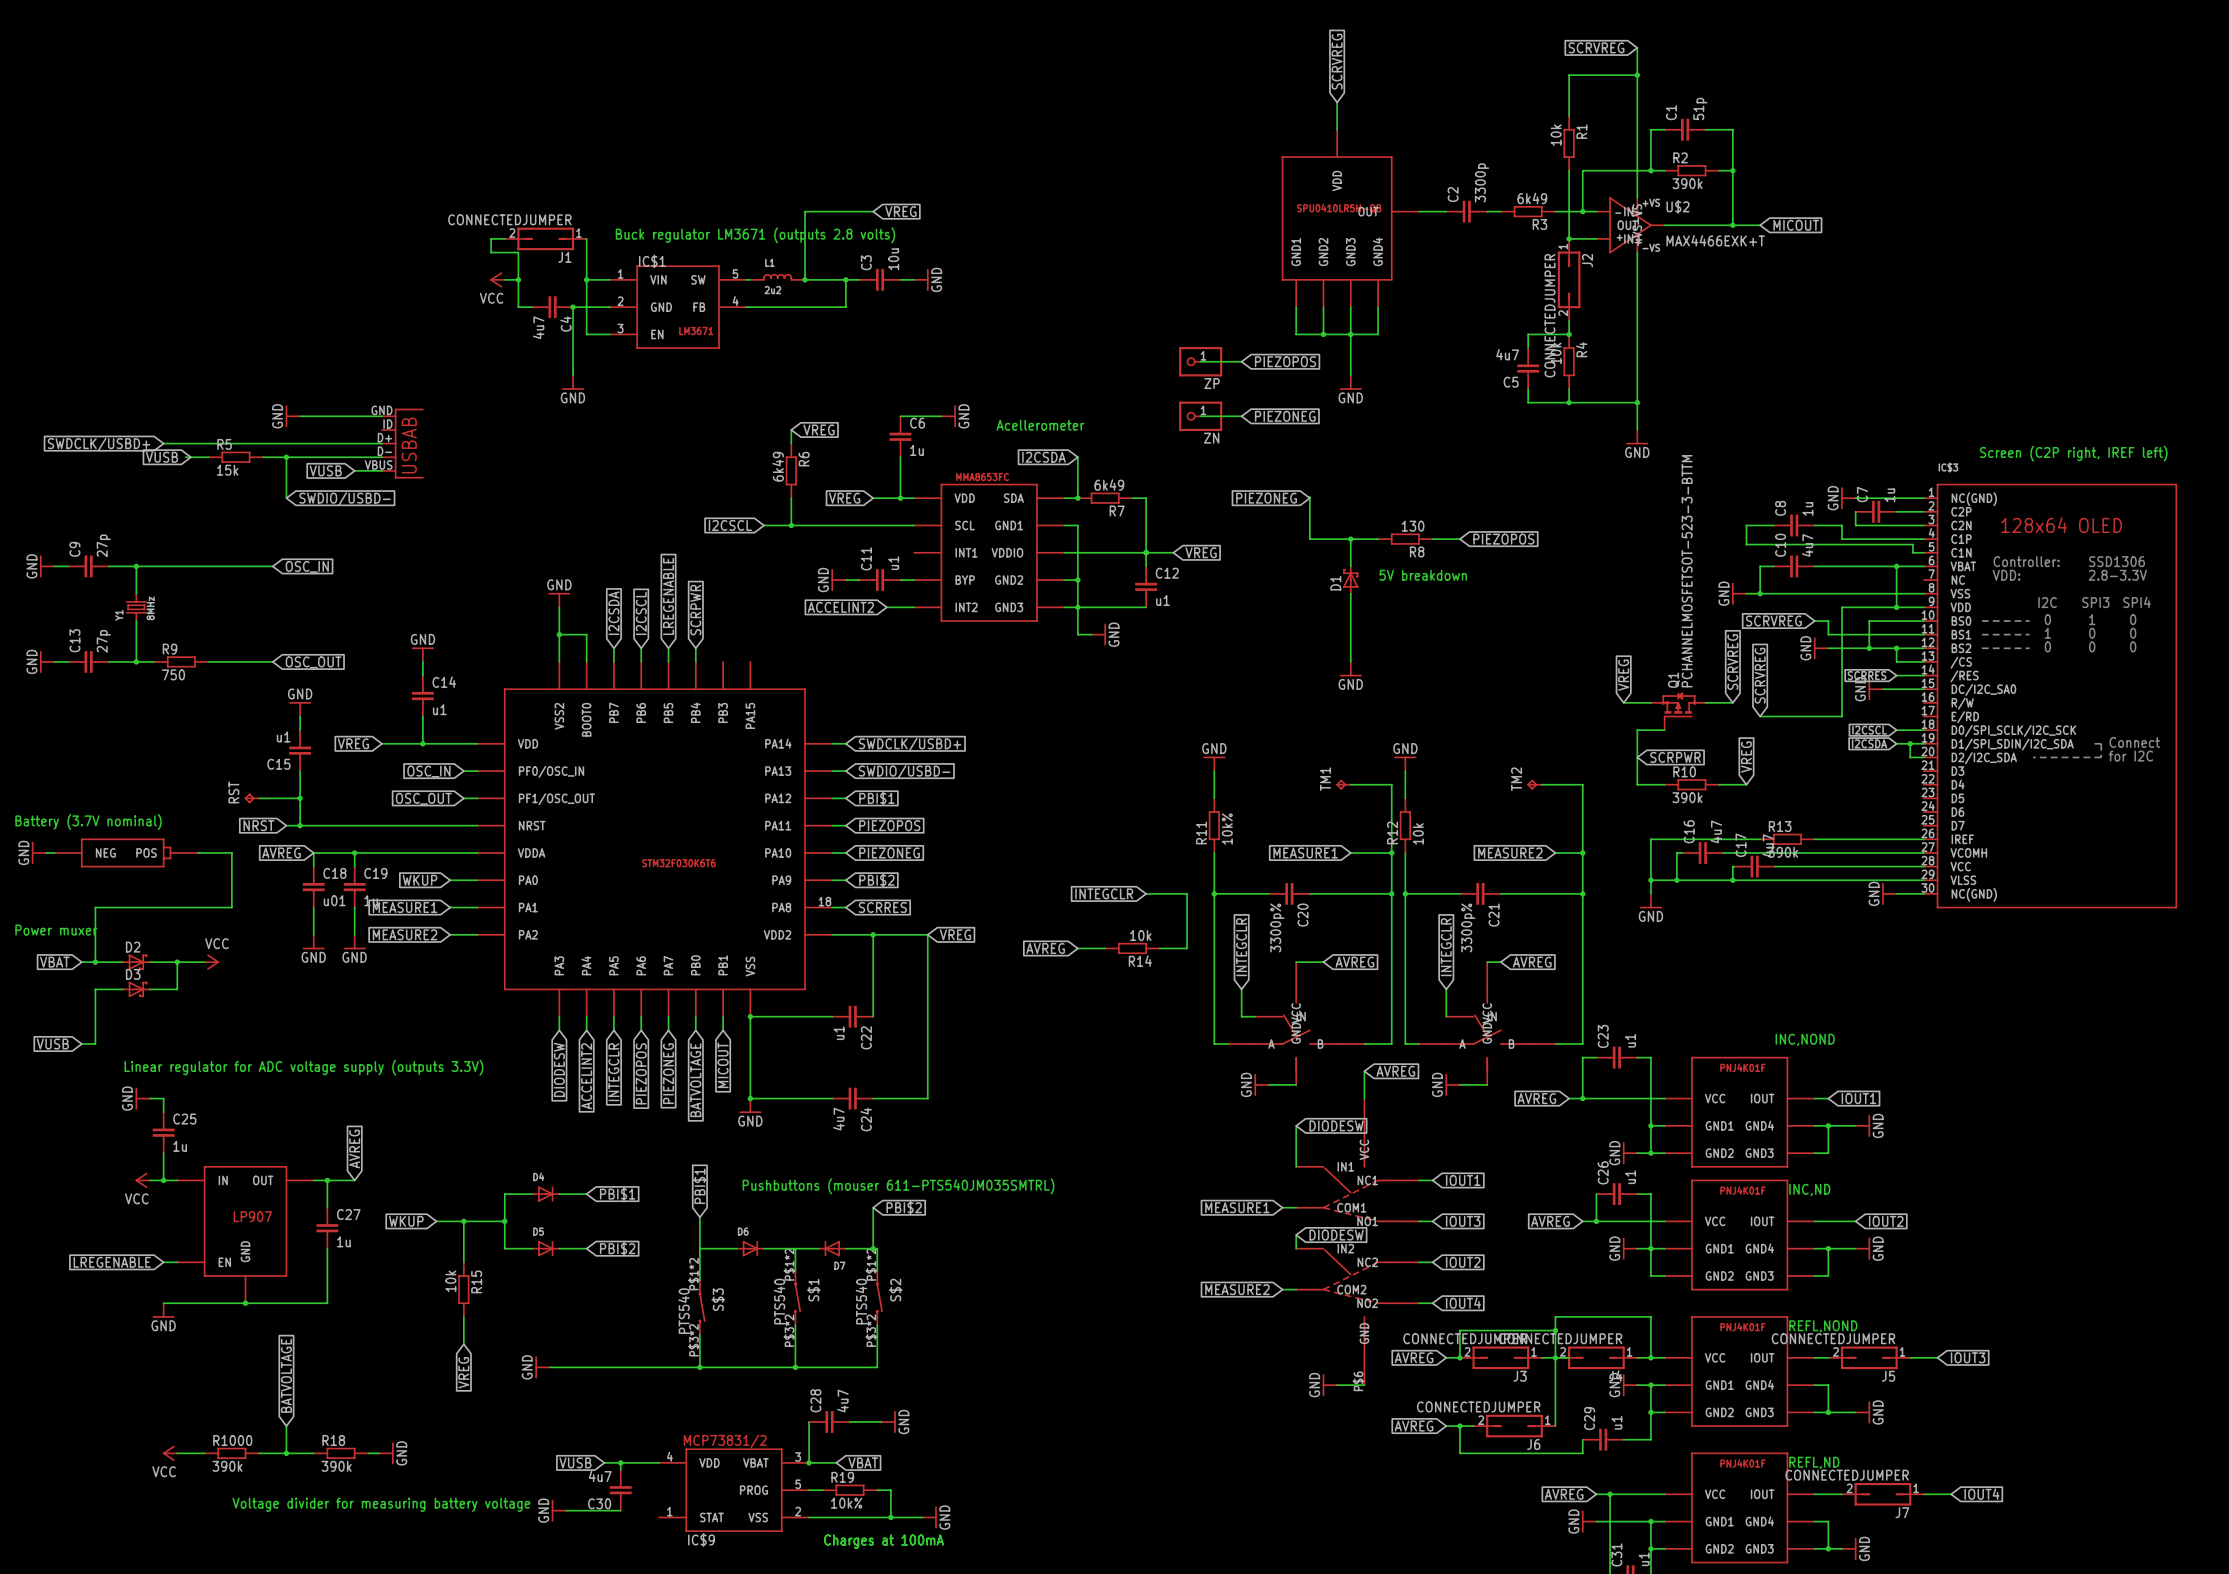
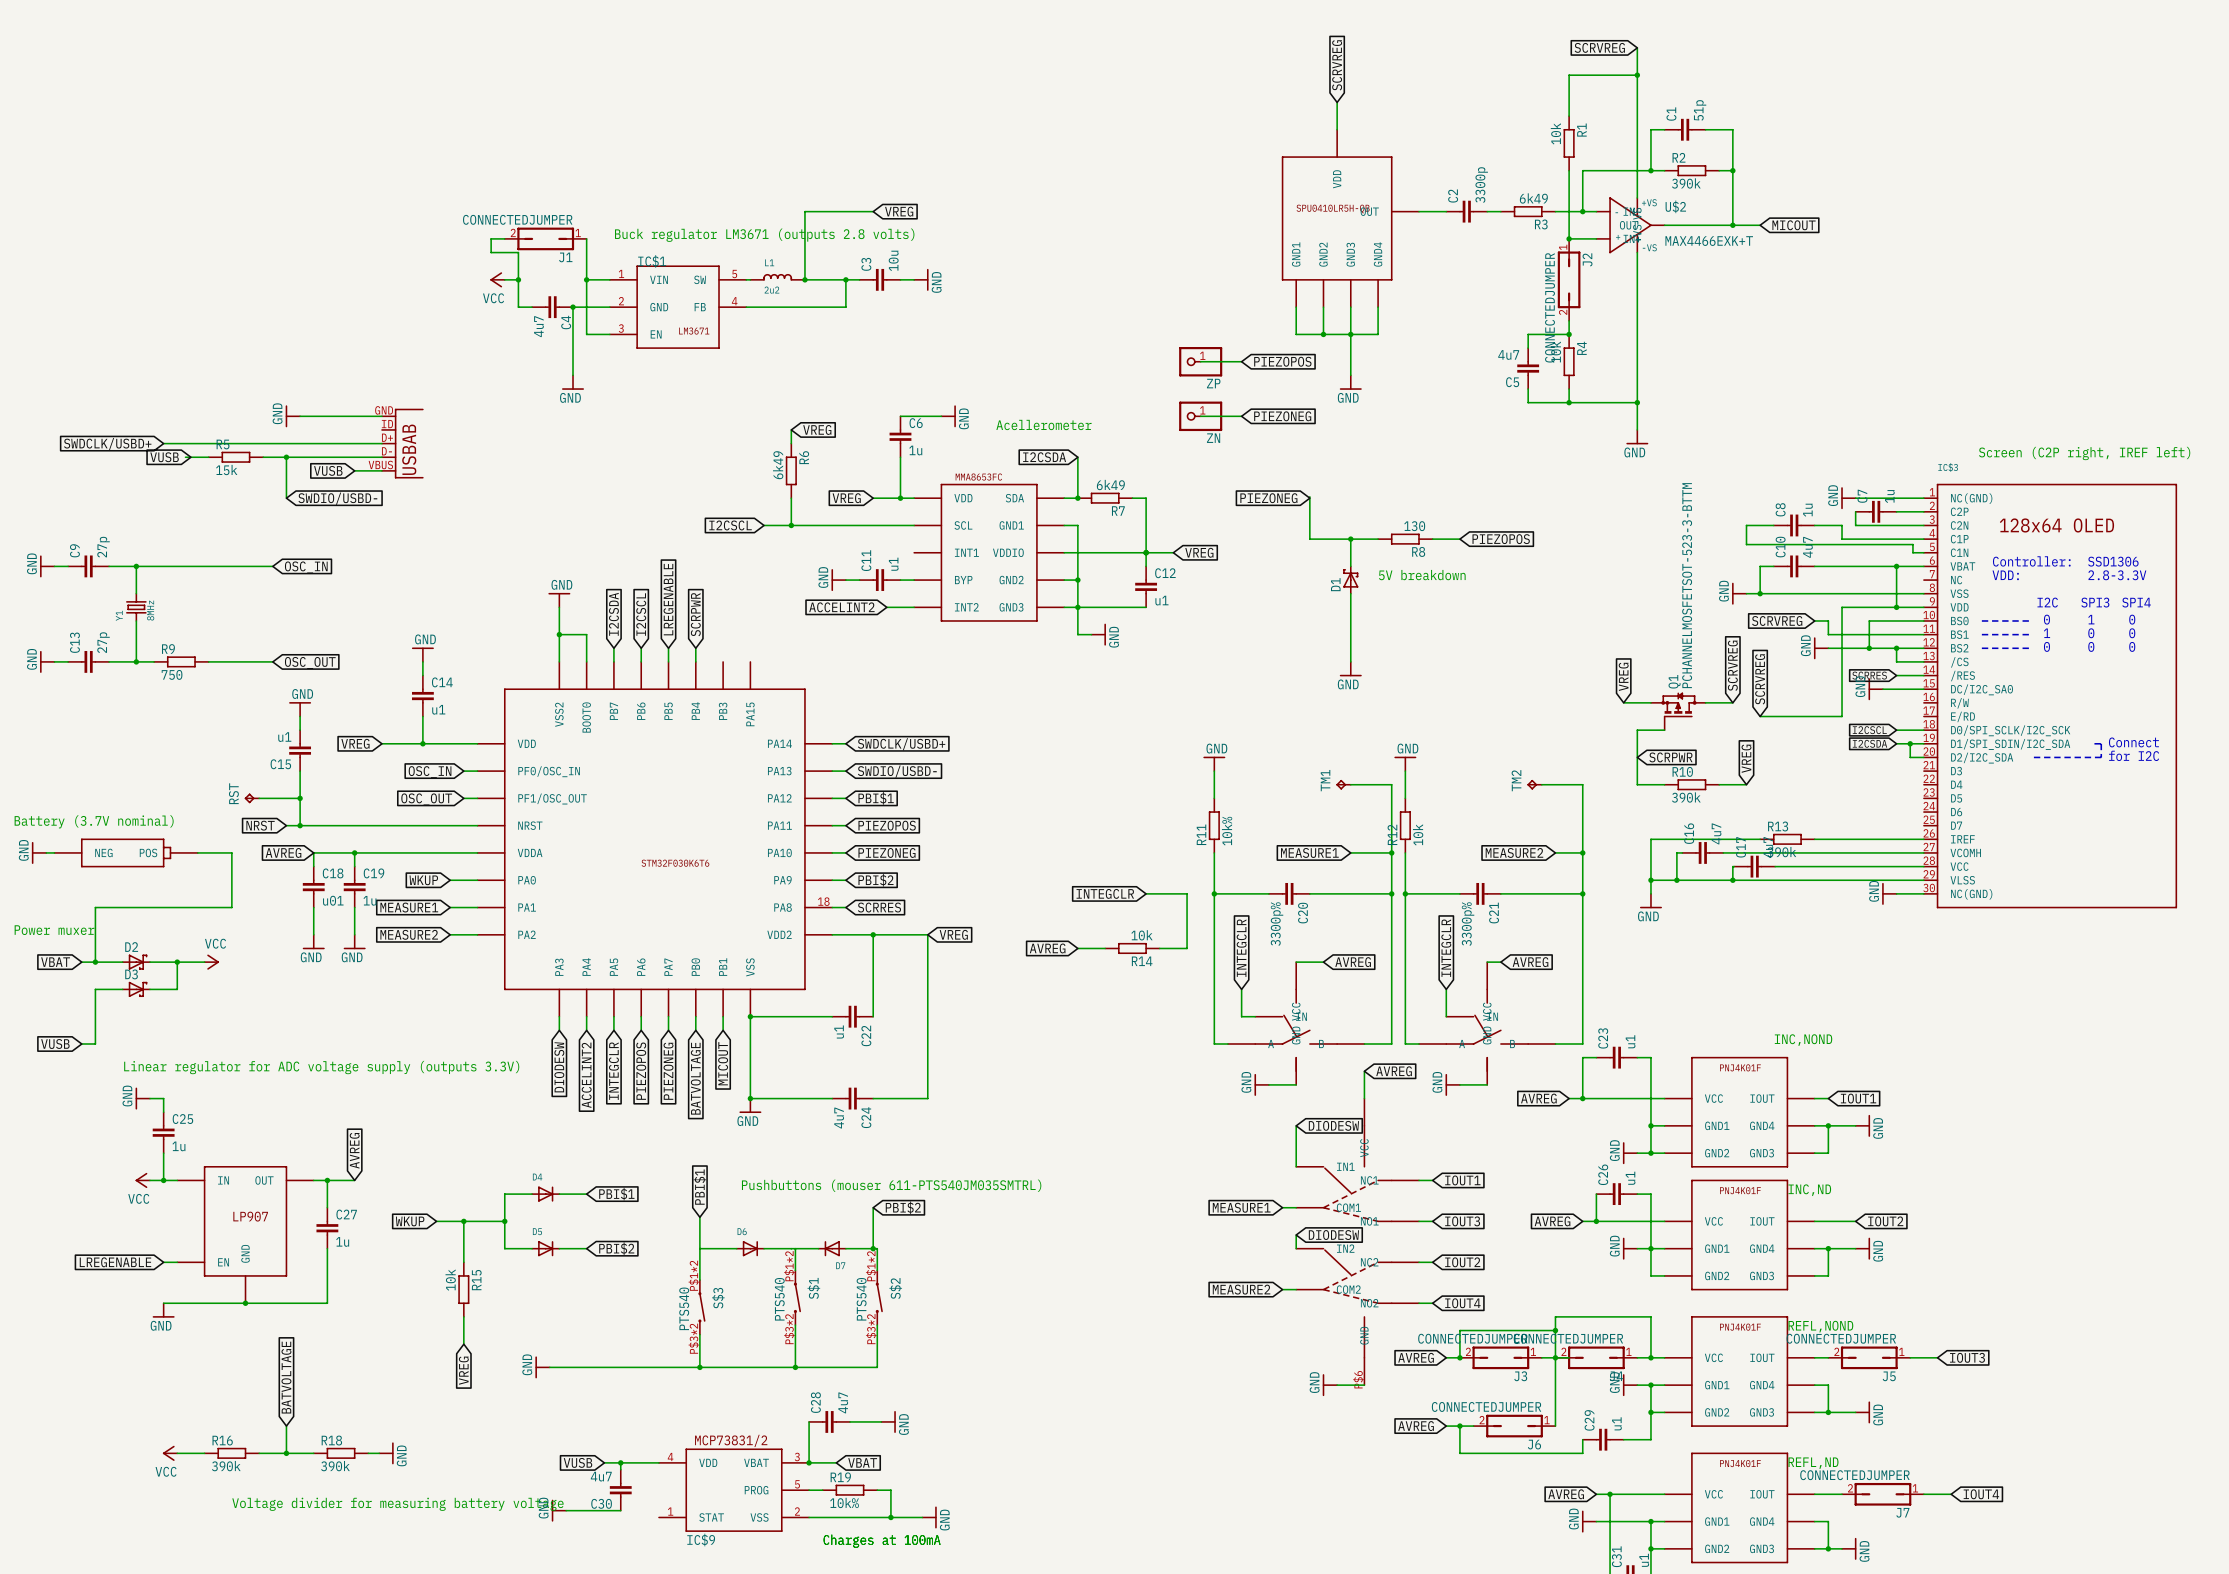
R1000 name: R1000 (232, 1440) -> R16 (222, 1440)

